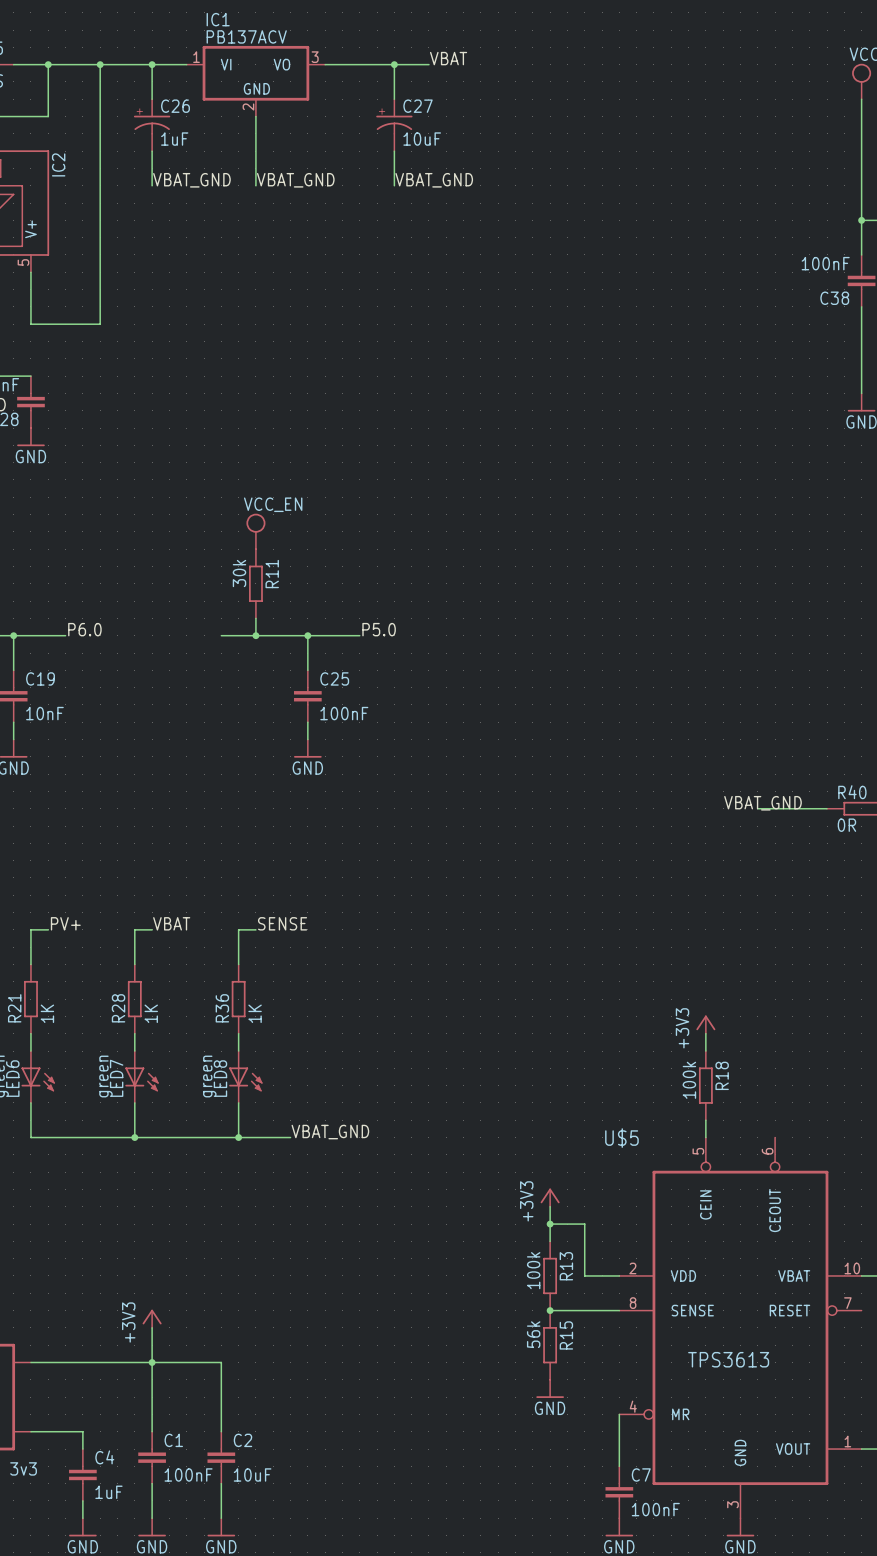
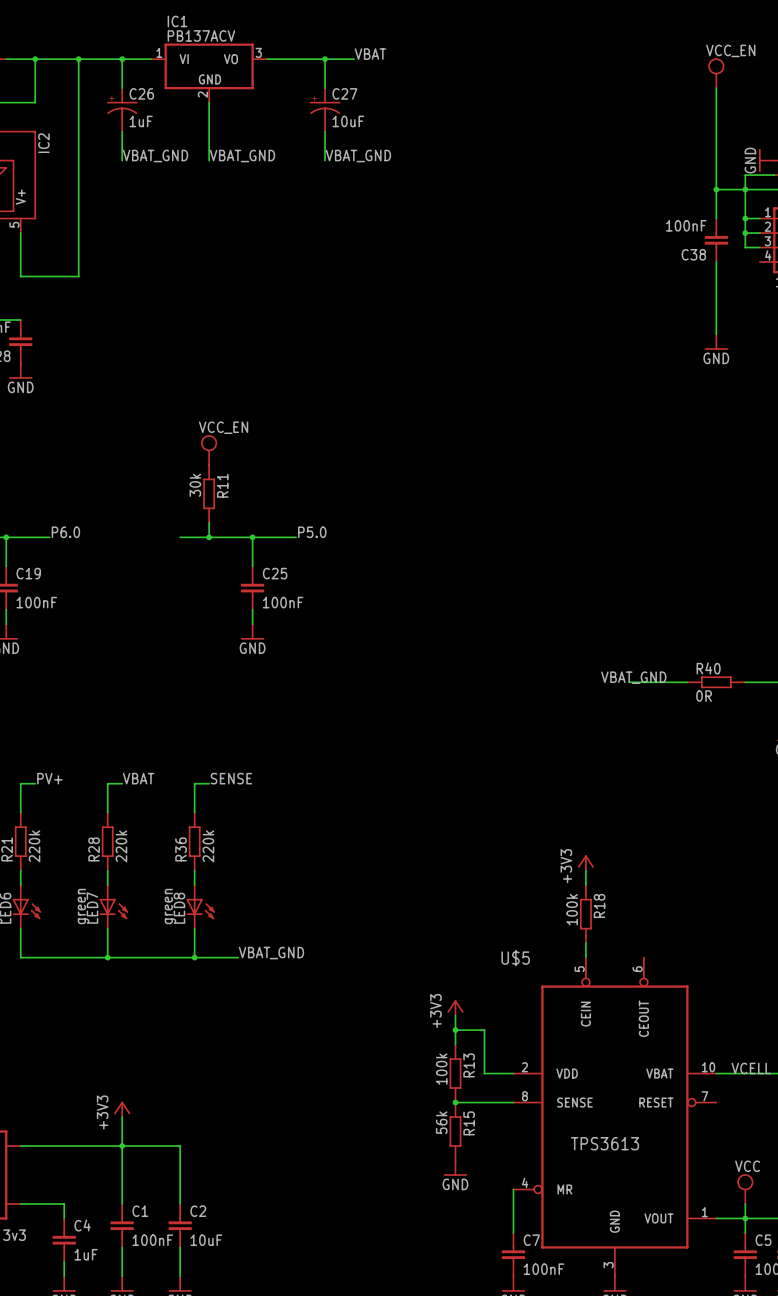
C19 value: 10nF (44, 713) -> 100nF (36, 602)
R21 value: 1K (47, 1013) -> 220k (34, 846)
R28 value: 1K (151, 1013) -> 220k (121, 846)
R36 value: 1K (255, 1013) -> 220k (208, 846)

